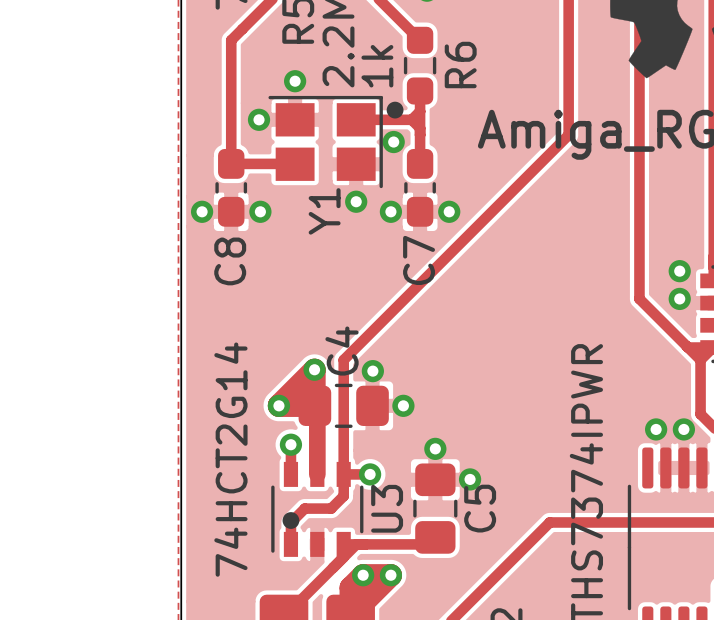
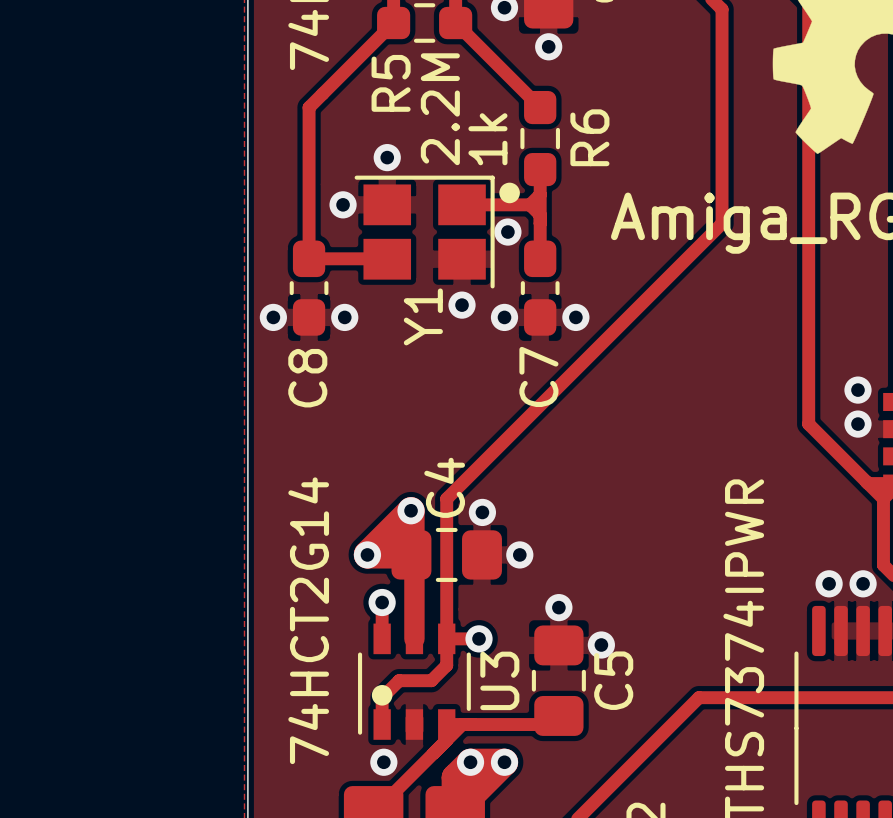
via: none -> (383, 762)

